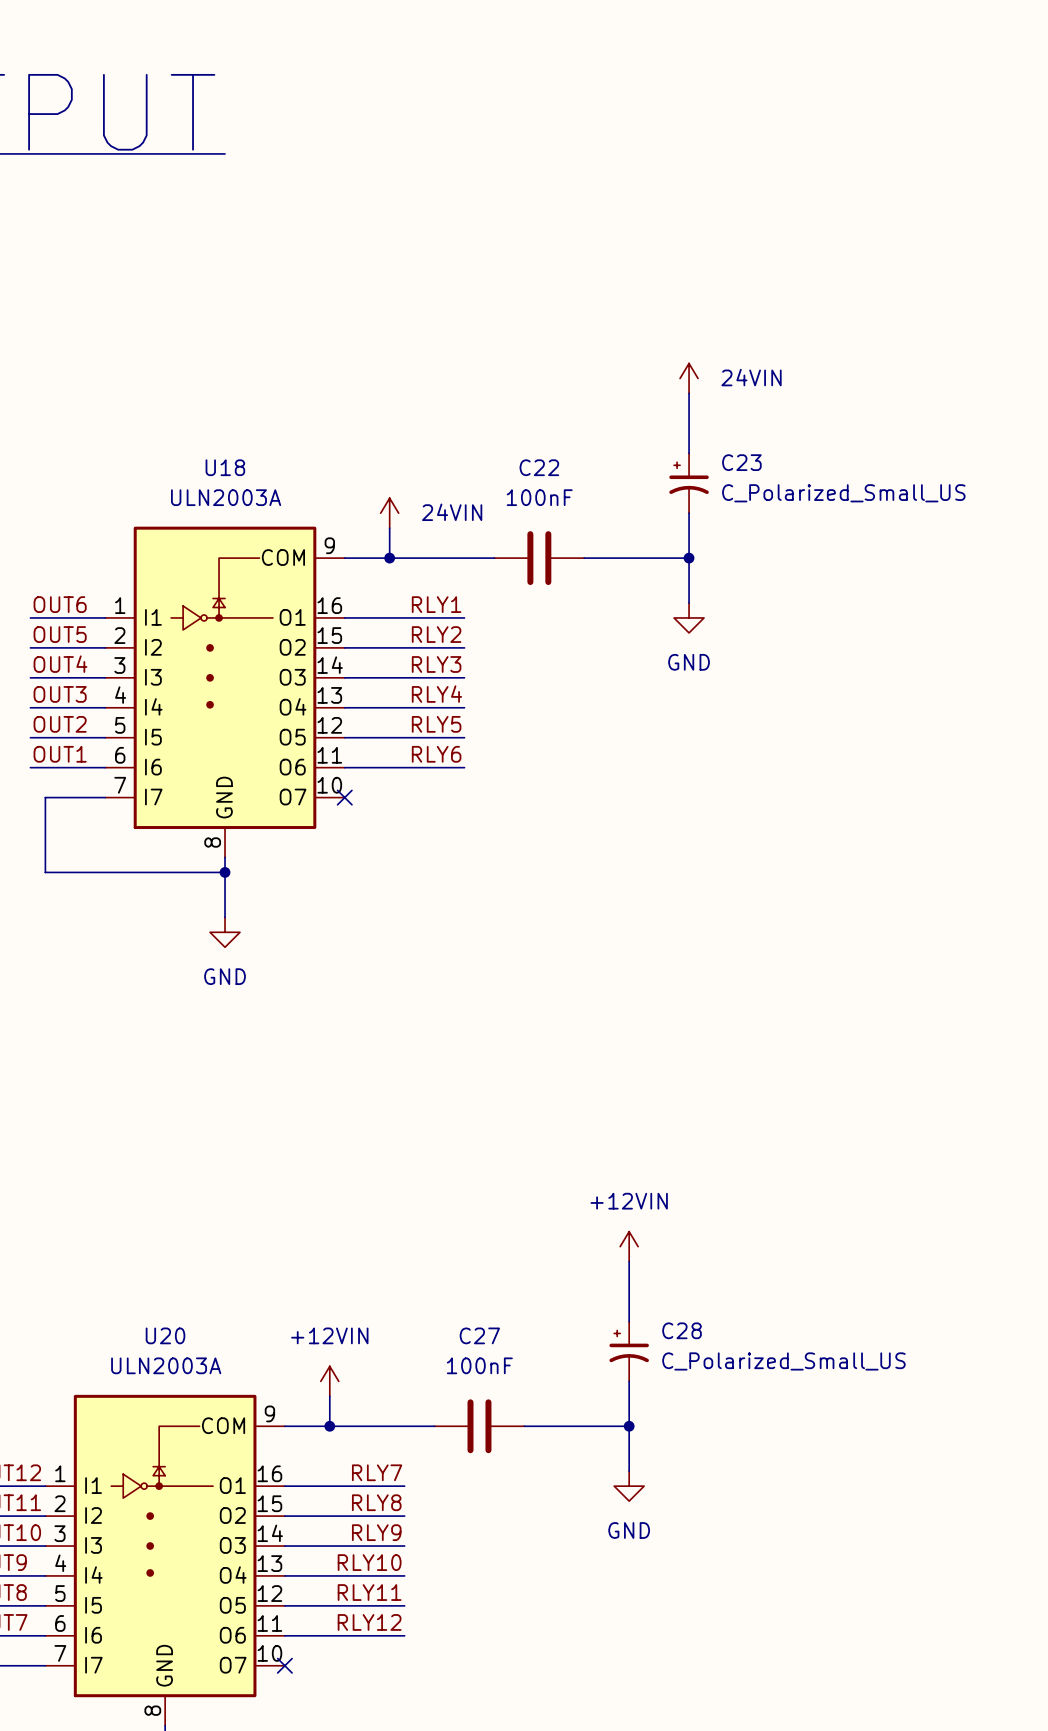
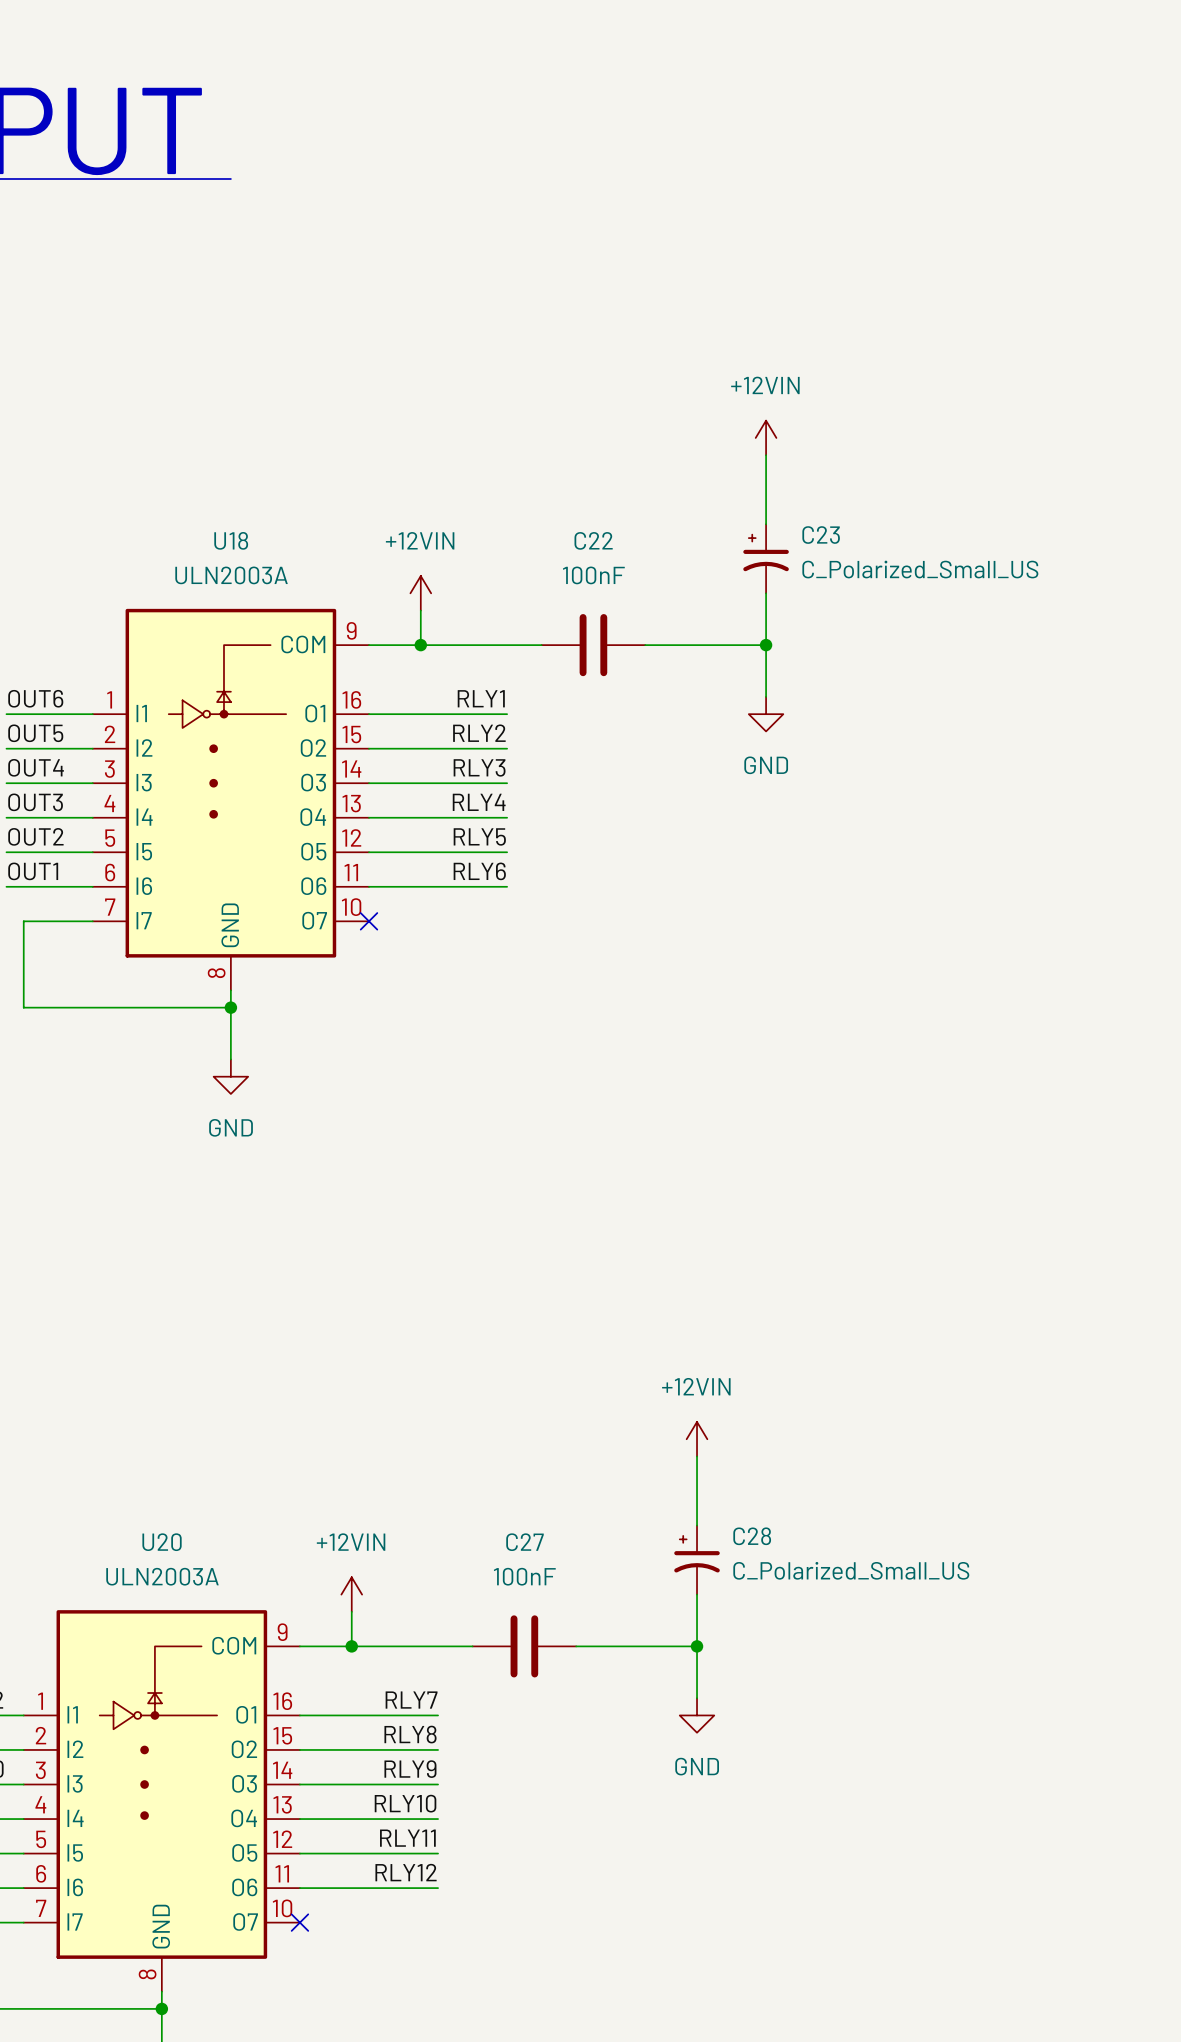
power symbol: 24VIN (689, 378) -> +12VIN (766, 437)
power symbol: 24VIN (389, 513) -> +12VIN (420, 593)

